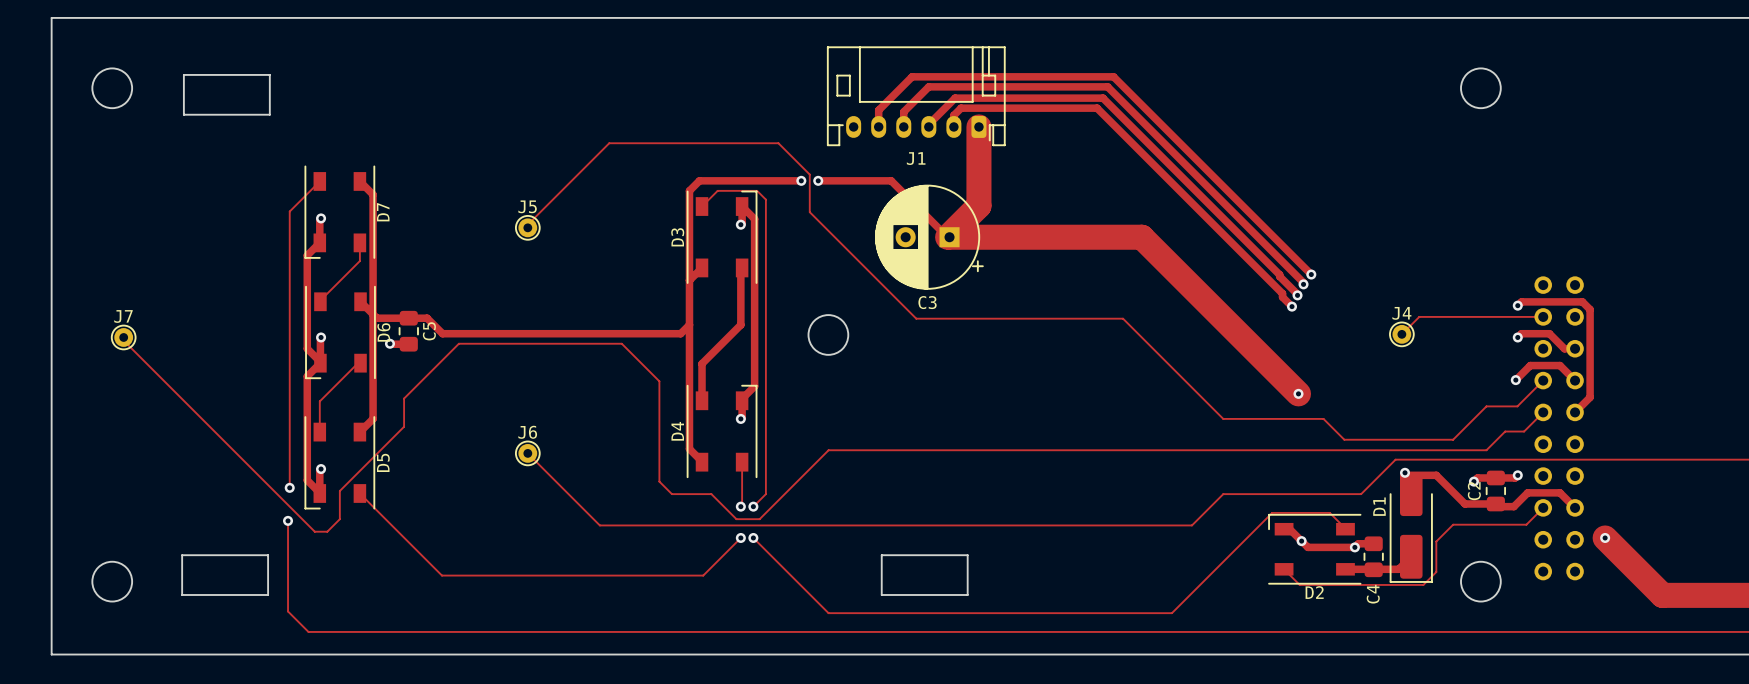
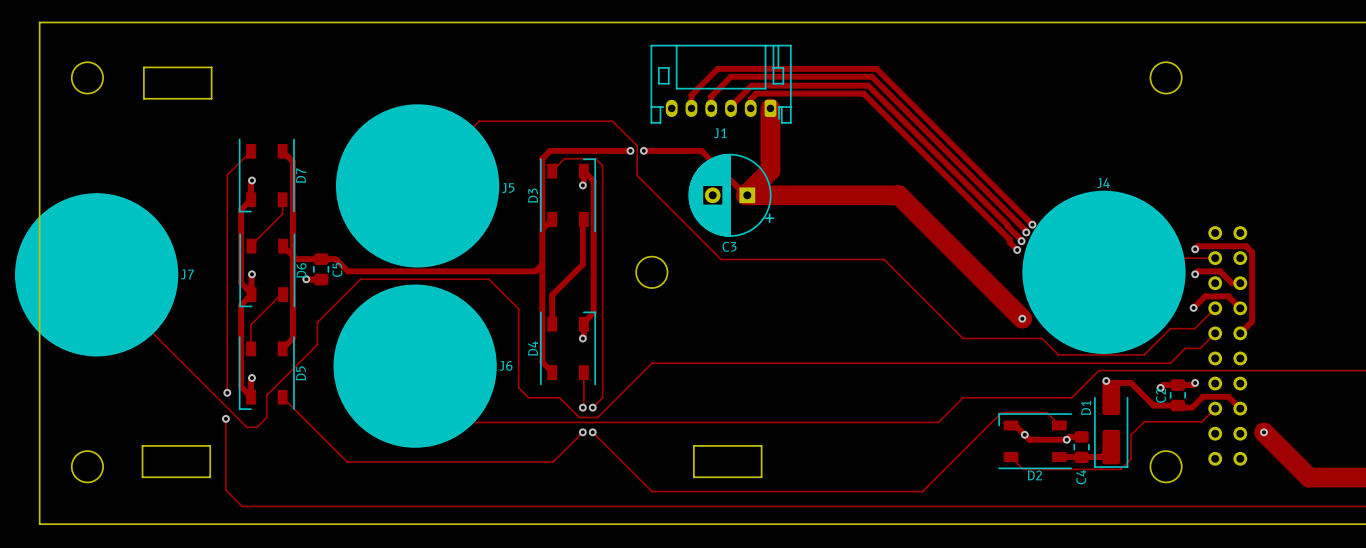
drawing: none -> [335, 104, 500, 268]
J5 name position: J5 (527, 206) -> J5 (508, 188)
drawing: none -> [1022, 190, 1186, 354]
drawing: none -> [15, 193, 179, 357]
J4 name position: J4 (1401, 313) -> J4 (1103, 183)
J7 name position: J7 (123, 316) -> J7 (187, 274)
drawing: none -> [333, 284, 497, 448]
J6 name position: J6 (527, 432) -> J6 (505, 365)

